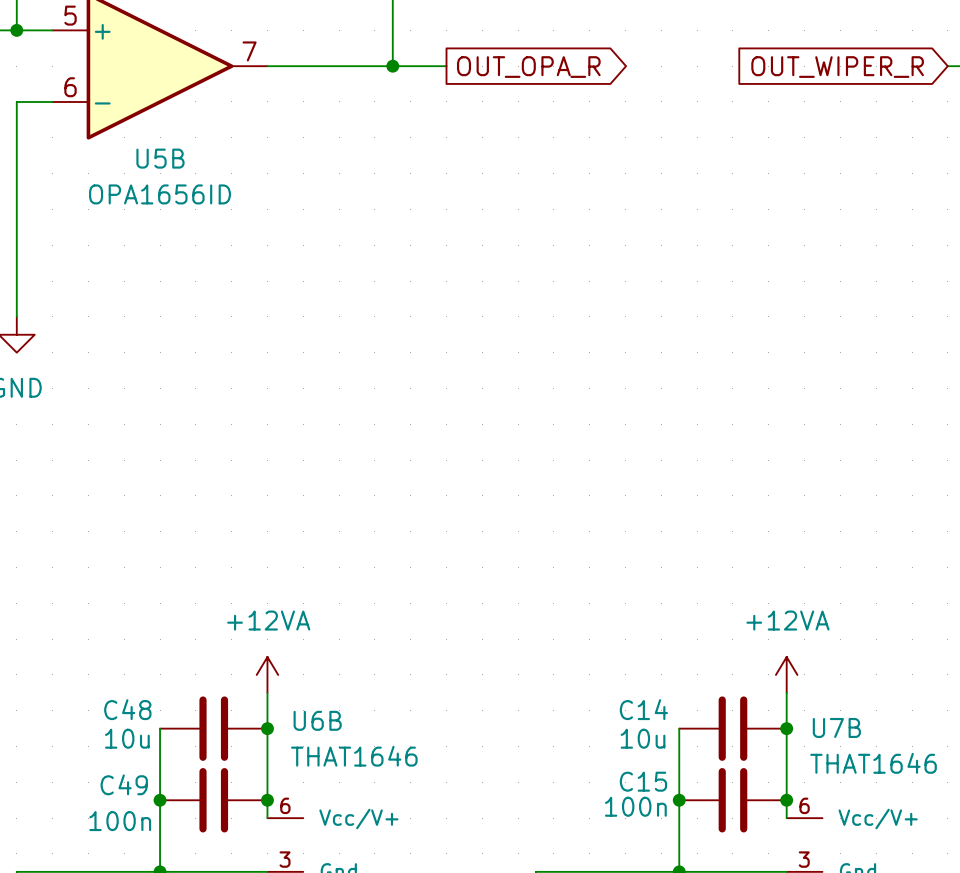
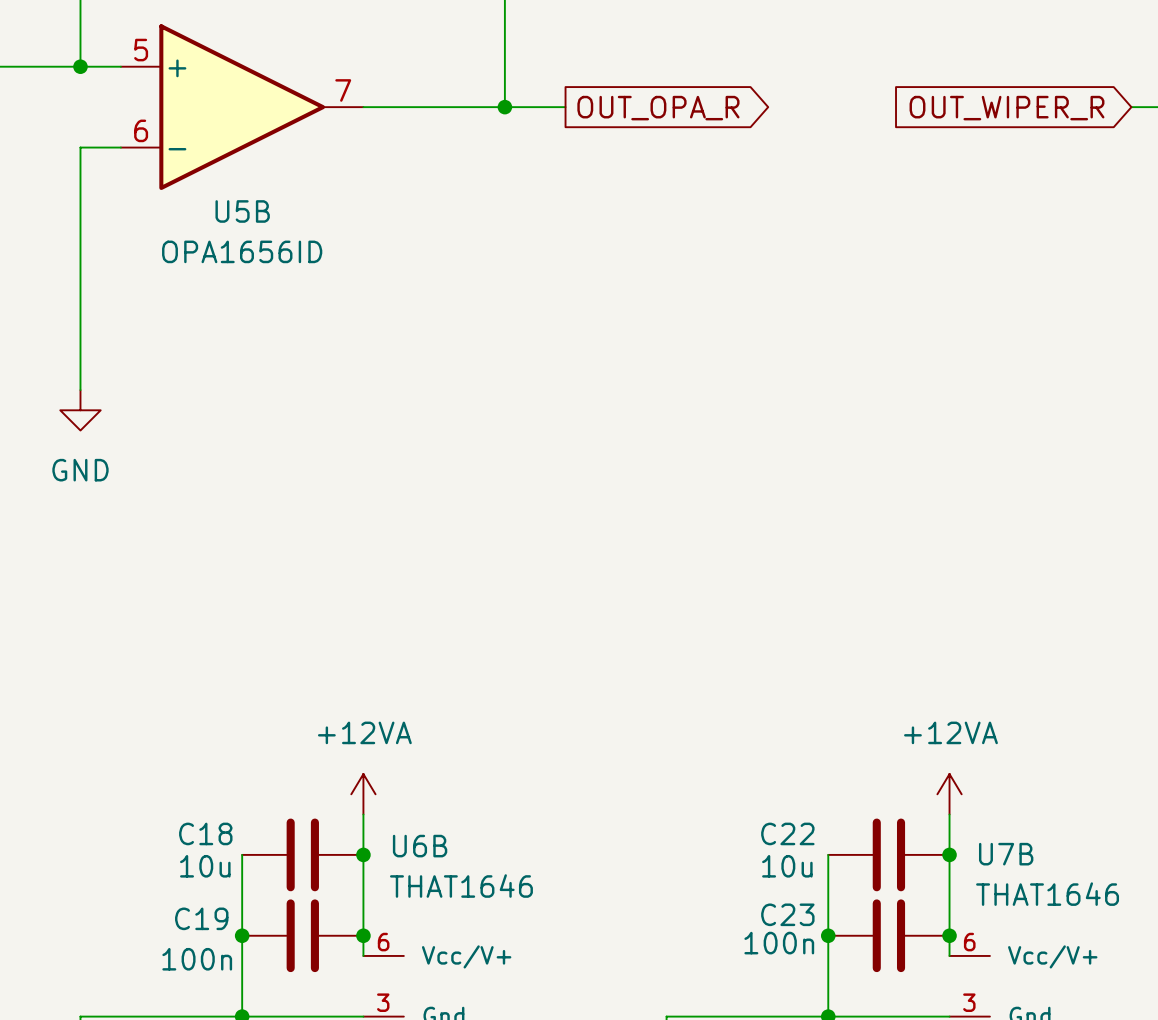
C48 name: C48 (127, 709) -> C18 (205, 833)
C14 name: C14 (643, 709) -> C22 (787, 833)
C15 name: C15 (643, 781) -> C23 (787, 914)
C49 name: C49 (124, 784) -> C19 (201, 918)

